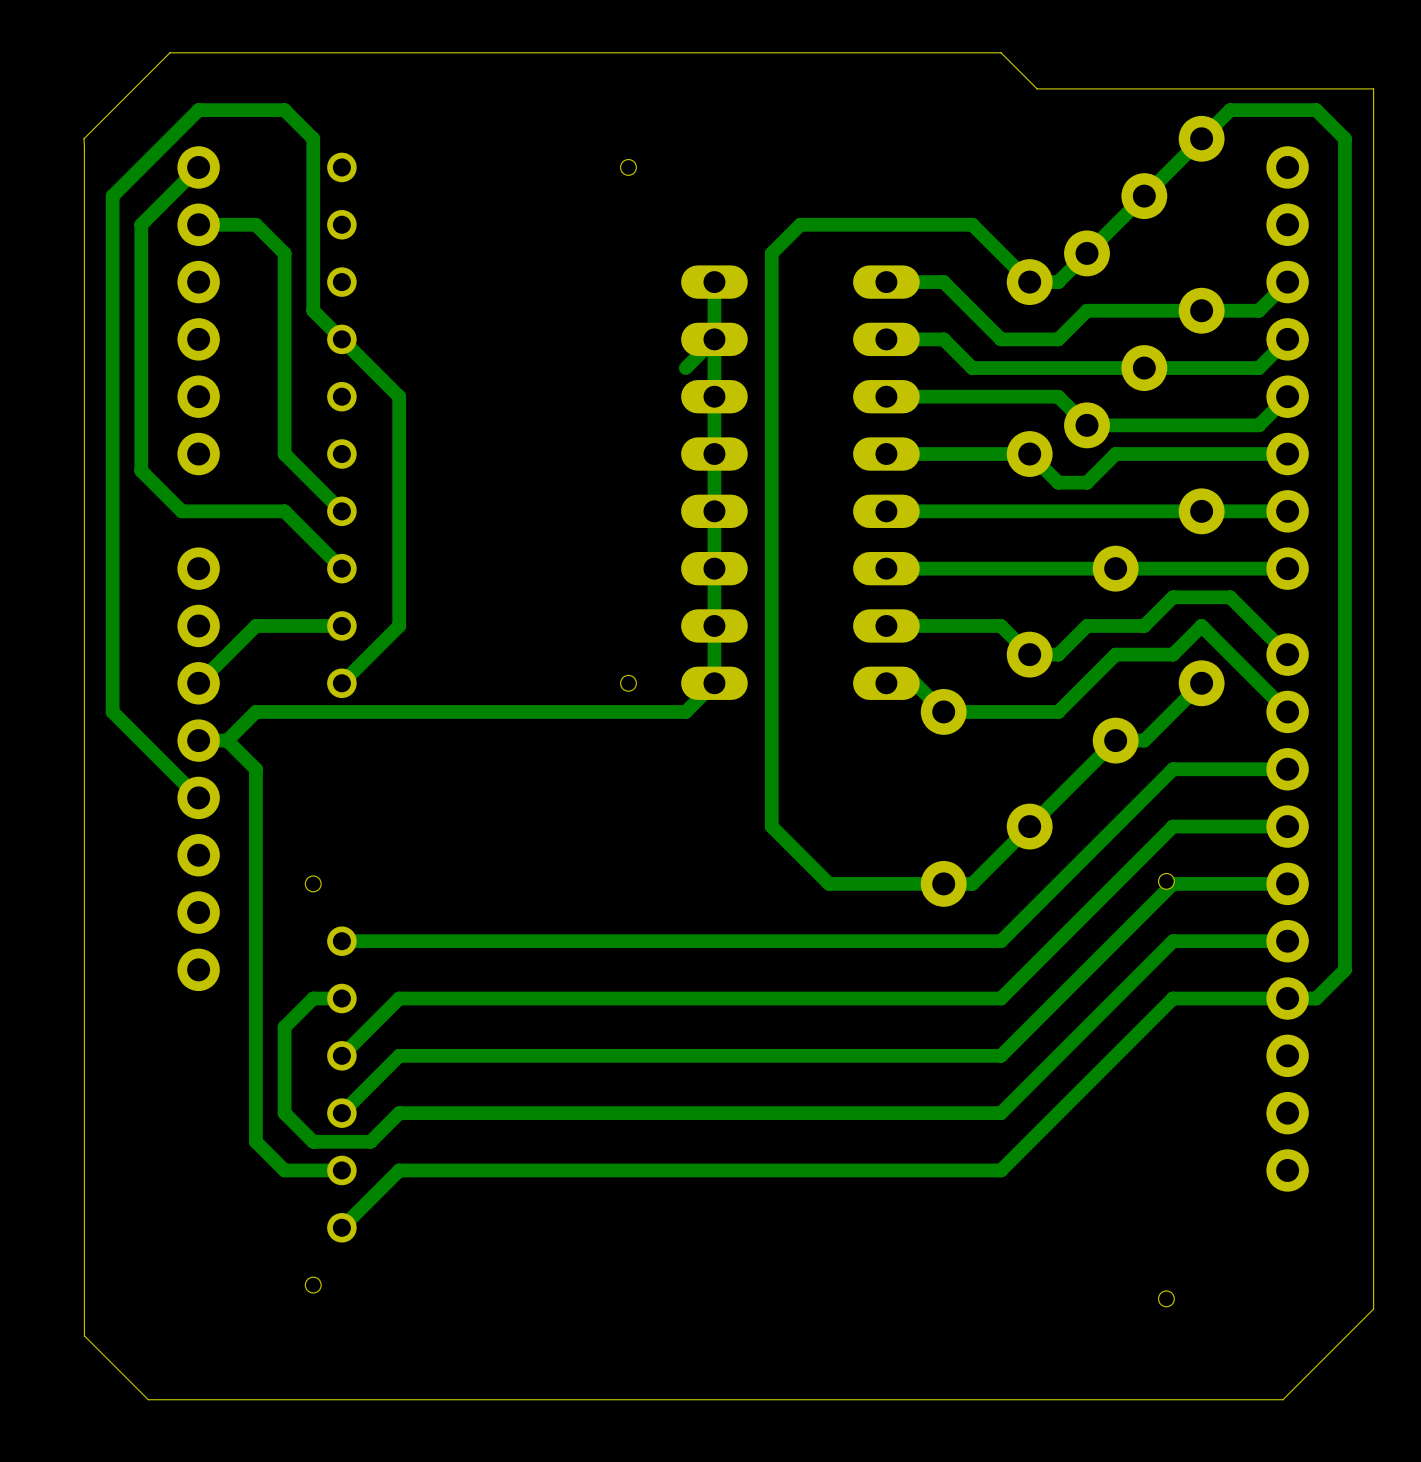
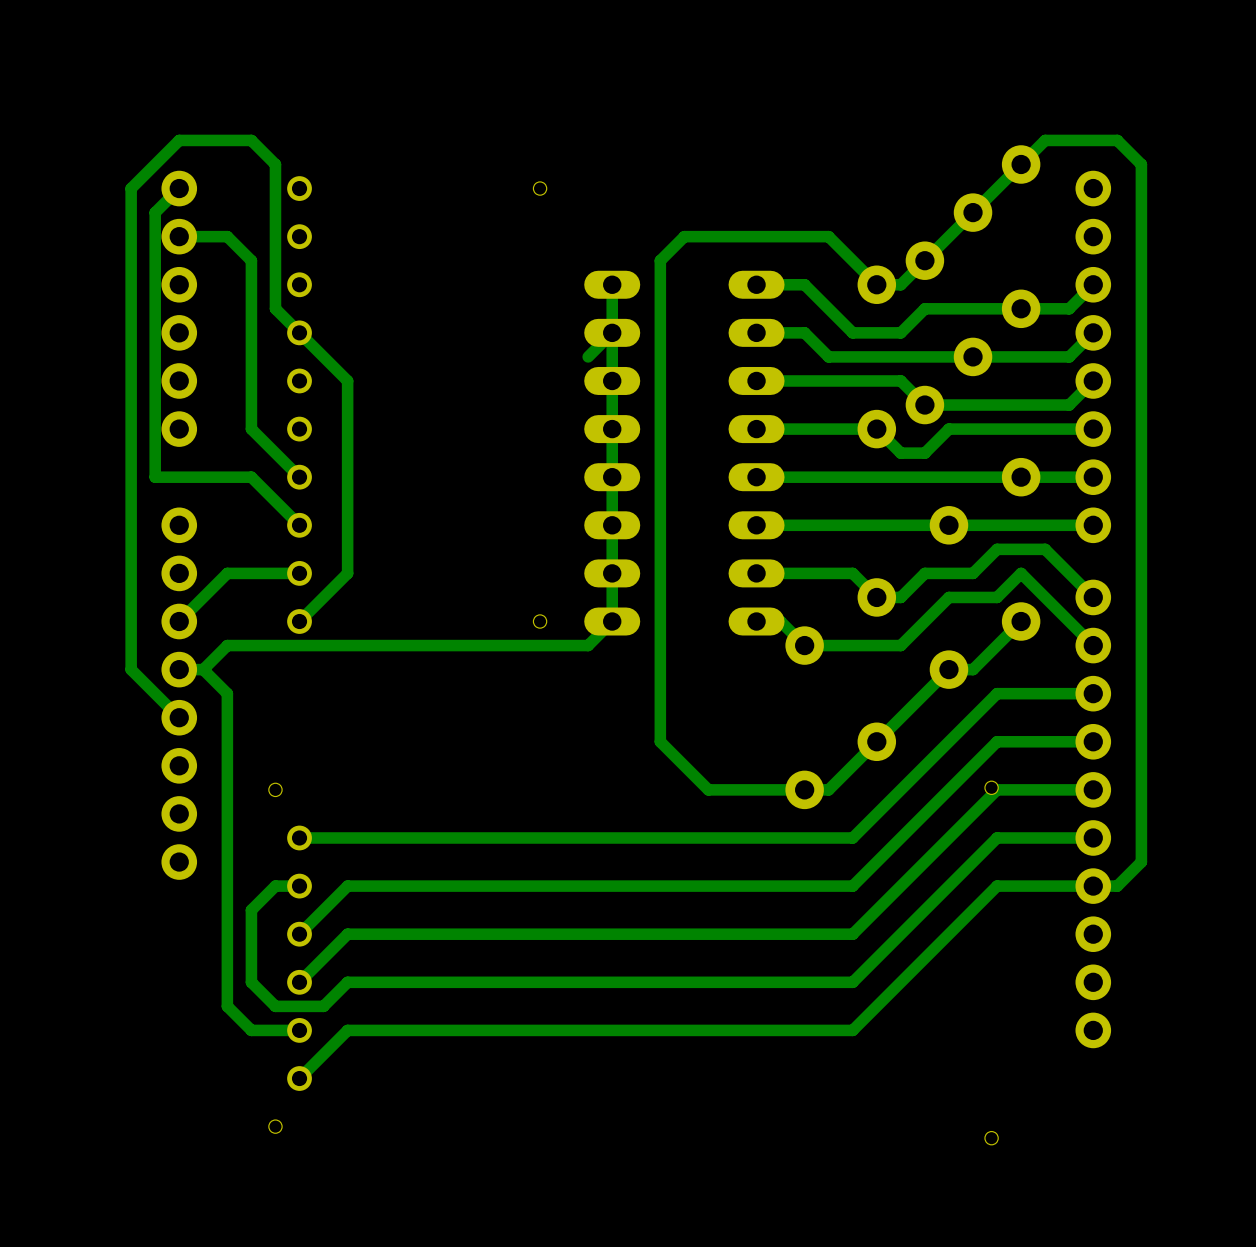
board edge: (1001, 52) (169, 52) (83, 138) (84, 1335) (148, 1399) (1282, 1399) (1373, 1309) (1373, 88) (1037, 88) (1001, 52) -> none
bottom track: (141, 167) (112, 196) (112, 711) (141, 740) -> none
bottom track: (169, 196) (141, 224) -> (131, 188) (131, 236)
bottom track: none -> (155, 212) (155, 477) (165, 477)
bottom track: (141, 470) (181, 511) -> (131, 443) (131, 669)

